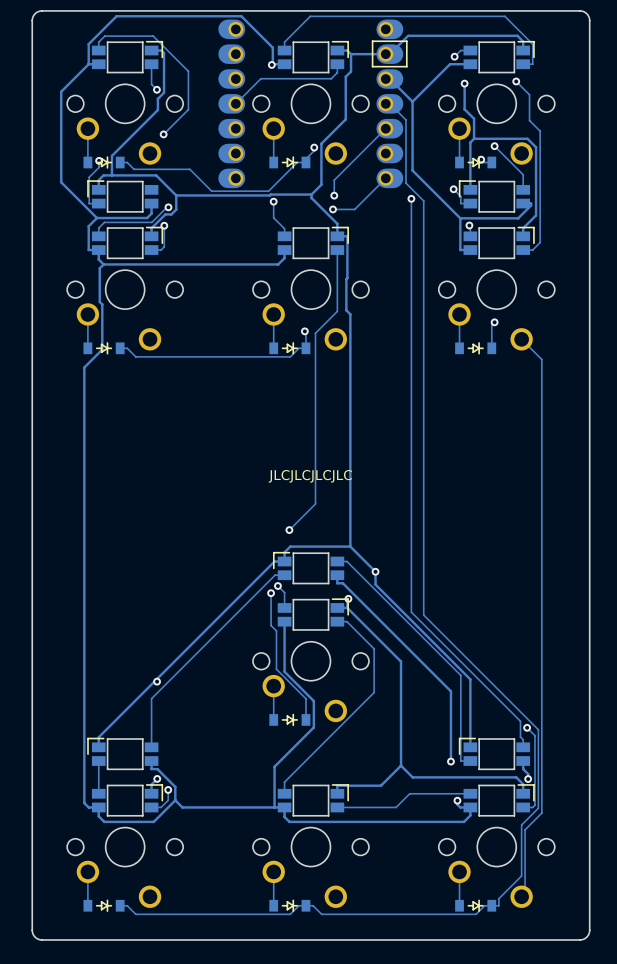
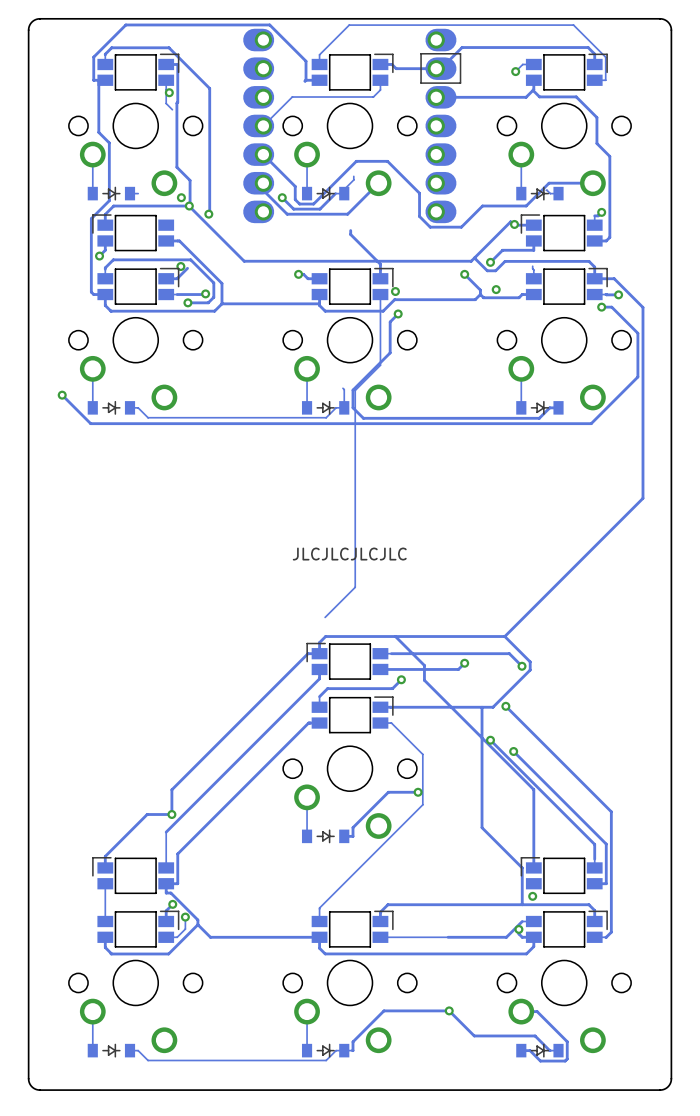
track: (98, 42) (104, 36) (153, 36) (188, 71) (188, 109) (163, 134) -> (105, 54) (111, 47) (169, 47) (209, 88) (208, 214)
track: (161, 50) (164, 52) (164, 92) (157, 98) (157, 109) (111, 155) (111, 175) -> none
track: (351, 54) (351, 71) (345, 76) (345, 119) (321, 143) (321, 184) (311, 194) (176, 195) -> none
track: (88, 64) (61, 91) (61, 182) (96, 218) -> none
via: (271, 64) -> none
track: (470, 64) (450, 64) (412, 101) -> (533, 80) (533, 89) (526, 97) (440, 97)
track: (389, 79) (412, 101) -> none
track: (516, 81) (529, 94) (529, 120) (540, 131) (540, 242) (532, 250) -> (618, 294) (605, 294)
via: (516, 81) -> none
track: (464, 83) (464, 109) (474, 118) (474, 138) -> none
via: (464, 83) -> none
via position: (156, 89) -> (169, 92)
track: (412, 101) (412, 170) (460, 218) -> none
track: (389, 103) (405, 119) (405, 183) (423, 200) (423, 615) (538, 729) (538, 808) (521, 824) (521, 875) (498, 898) (498, 905) (491, 905) -> none
track: none -> (263, 154) (295, 186) (295, 199) (299, 204) (313, 204) (356, 161) (387, 161) (419, 193) (419, 216) (430, 227) (461, 227) (482, 206) (526, 206) (549, 183) (592, 183)
track: (385, 128) (334, 180) (334, 195) -> none
via: (163, 134) -> none
track: (474, 138) (527, 138) (536, 147) (536, 215) (523, 228) -> (474, 257) (487, 270) (495, 270) (505, 261) (589, 261) (594, 269)
track: (474, 138) (470, 142) (470, 189) -> (177, 64) (176, 167) (190, 180) (190, 207) (244, 261) (471, 261) (510, 221) (514, 225) (533, 225)
track: (494, 146) (523, 174) (523, 181) -> (601, 212) (598, 215) (594, 215)
via: (494, 146) -> none
via: (314, 147) -> none
track: none -> (378, 183) (347, 214) (287, 214) (263, 190) (263, 183)
via: (481, 159) -> none
track: (99, 160) (99, 167) (89, 177) (89, 203) (98, 203) -> (99, 256) (105, 250) (105, 240)
via: (99, 160) -> none
track: (298, 162) (268, 191) (211, 191) (189, 169) (134, 169) (127, 162) -> (335, 193) (320, 209) (293, 209) (282, 197)
via: none -> (181, 197)
via: none -> (282, 197)
via: none -> (189, 206)
track: (385, 178) (354, 209) (333, 209) -> none
via: none -> (601, 212)
track: (98, 180) (103, 175) (156, 175) (176, 195) -> (105, 214) (113, 206) (190, 206)
via: none -> (208, 214)
track: (453, 189) (460, 196) (460, 203) (470, 203) -> (490, 262) (502, 250) (533, 250) (533, 240)
track: (176, 195) (176, 209) (171, 214) (165, 214) (151, 228) (151, 236) -> (187, 268) (177, 278) (166, 278)
via: (334, 195) -> none
track: (411, 198) (411, 612) (520, 721) (520, 737) (523, 739) -> (490, 740) (594, 844) (594, 859)
via: (411, 198) -> none
track: (273, 201) (273, 217) (284, 228) (284, 236) -> (298, 274) (303, 274) (308, 278) (319, 278)
via: (273, 201) -> none
track: (151, 203) (151, 213) (147, 218) (96, 218) -> (166, 240) (179, 240) (221, 283) (221, 303)
track: (531, 203) (518, 218) (460, 218) -> (603, 240) (609, 237) (609, 156) (596, 143) (596, 117) (576, 96) (539, 96) (533, 90)
track: (168, 207) (151, 222) (104, 222) (98, 228) -> (187, 302) (208, 302) (213, 297) (213, 282) (190, 259) (113, 259) (105, 269)
via: (168, 207) -> none
via: (333, 209) -> none
via: none -> (99, 256)
track: (96, 218) (88, 226) (88, 250) -> (98, 80) (98, 132) (109, 142) (109, 200) (91, 218) (91, 292) (93, 294)
track: (460, 218) (460, 250) -> (480, 294) (483, 297) (519, 297) (522, 294)
via: none -> (490, 262)
track: (164, 225) (164, 246) (161, 250) -> (205, 293) (177, 294)
via: (469, 225) -> none
via: none -> (298, 274)
track: none -> (464, 274) (480, 290) (480, 294)
via: none -> (464, 274)
track: (337, 236) (347, 236) (346, 310) (350, 314) (350, 546) (290, 546) (284, 552) -> (504, 636) (325, 636) (319, 643)
track: none -> (594, 278) (614, 278) (642, 307) (642, 498) (504, 636)
via: none -> (496, 289)
via: none -> (395, 291)
via: none -> (205, 293)
track: none -> (480, 294) (475, 299) (394, 299) (383, 311) (325, 311) (319, 303) (221, 303)
via: none -> (618, 294)
via: none -> (187, 302)
track: (284, 258) (278, 264) (193, 264) -> (221, 303) (214, 311)
track: none -> (601, 307) (611, 307) (637, 333) (637, 376) (591, 423) (90, 423) (62, 395)
via: none -> (601, 307)
track: (103, 264) (99, 268) (102, 349) (84, 367) (84, 803) (88, 807) (98, 807) -> none
via: none -> (398, 313)
track: (494, 322) (491, 325) (491, 348) -> (398, 313) (390, 321) (390, 352) (353, 390) (353, 407) (363, 418) (539, 418) (549, 407) (558, 407)
via: (494, 322) -> none
via: (304, 331) -> none
via: none -> (62, 395)
track: (521, 339) (541, 359) (541, 813) (525, 829) (525, 893) (521, 896) -> none
via: (289, 530) -> none
track: none -> (504, 636) (530, 661) (530, 670) (493, 707) (392, 707)
track: (346, 561) (460, 675) (460, 761) (470, 761) -> (391, 653) (509, 653) (522, 666)
via: none -> (464, 663)
via: (375, 571) -> none
via: none -> (522, 666)
track: (284, 575) (275, 575) (151, 698) (151, 716) -> (319, 669) (319, 678) (166, 832)
track: (337, 575) (337, 583) (342, 583) (450, 691) (450, 761) -> (380, 669) (458, 669) (464, 663)
via: none -> (401, 679)
track: (277, 586) (284, 592) (284, 598) -> (401, 679) (392, 688) (327, 688) (319, 696)
via: (277, 586) -> none
track: (271, 593) (271, 625) (276, 630) (276, 669) (305, 698) (305, 719) -> (418, 792) (388, 792) (353, 827) (353, 836) (344, 836)
via: (271, 593) -> none
track: (348, 598) (347, 607) (401, 661) (401, 765) -> none
via: (348, 598) -> none
track: none -> (482, 707) (482, 827) (522, 867) (522, 904)
via: none -> (505, 706)
track: (284, 621) (284, 671) (313, 701) (313, 727) (274, 766) (274, 807) -> (319, 723) (308, 723) (177, 853) (177, 883) (166, 883)
via: none -> (490, 740)
via: none -> (513, 751)
track: (157, 678) (157, 681) (154, 681) (135, 700) -> (172, 789) (171, 814) (147, 814)
via position: (157, 681) -> (171, 814)
via: none -> (418, 792)
track: (527, 727) (534, 735) (534, 805) (532, 807) -> (505, 706) (611, 811) (611, 932) (605, 937)
via: (527, 727) -> none
via position: (450, 761) -> (532, 896)
track: (523, 761) (523, 769) (528, 774) (528, 779) -> (594, 883) (606, 883) (606, 844) (513, 751)
track: (401, 765) (412, 777) (516, 777) (518, 779) -> (380, 912) (387, 904) (588, 904)
track: (401, 765) (381, 785) (337, 785) -> none
track: (155, 769) (175, 786) (175, 800) (182, 807) (189, 807) -> (170, 893) (197, 920) (197, 924)
via: (528, 779) -> none
track: (460, 793) (409, 793) (396, 807) -> (522, 921) (506, 937) (448, 937)
track: none -> (197, 924) (210, 937)
via: none -> (449, 1010)
track: (459, 871) (459, 905) -> (521, 1011) (537, 1011) (567, 1041) (567, 1059) (565, 1061) (540, 1061) (530, 1050) (521, 1050)
track: (484, 905) (476, 914) (321, 914) (313, 905) -> (550, 1050) (535, 1035) (474, 1035) (449, 1010) (383, 1010) (353, 1041) (352, 1050)

